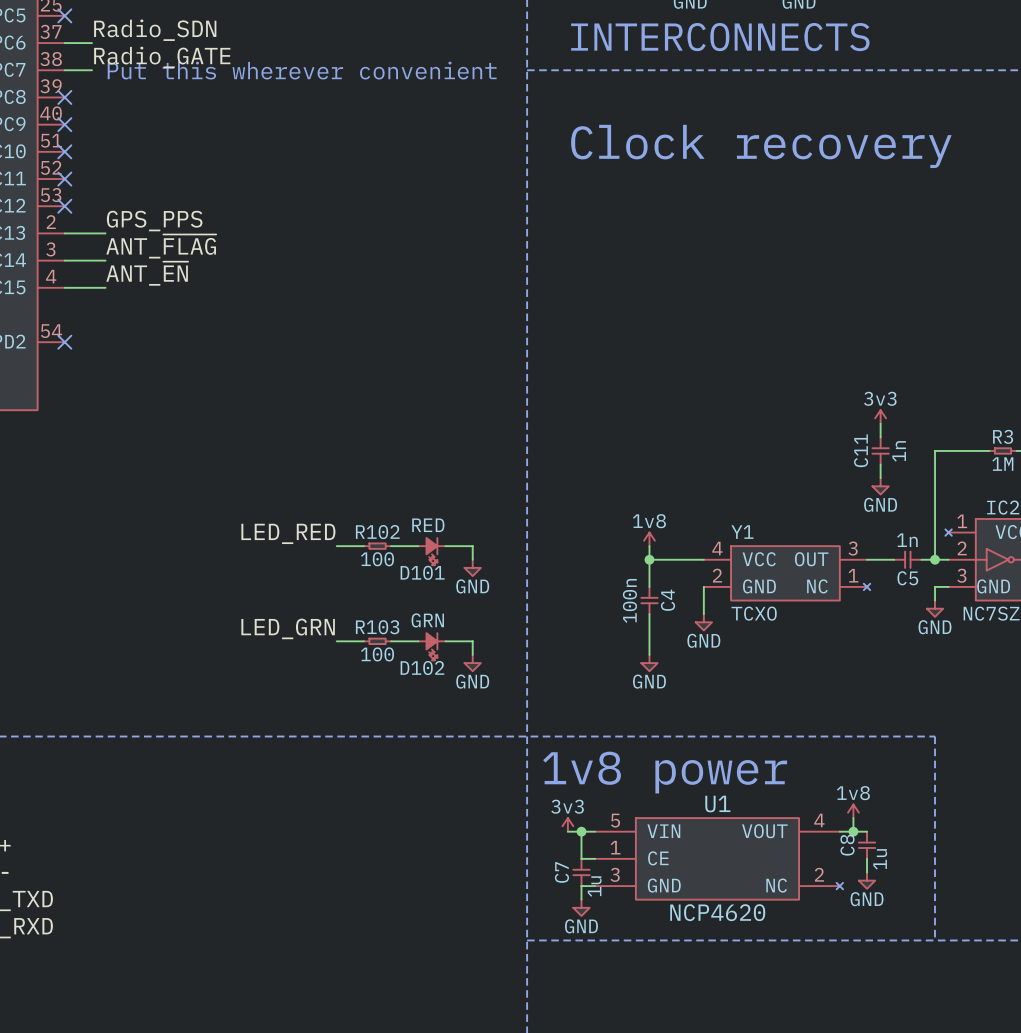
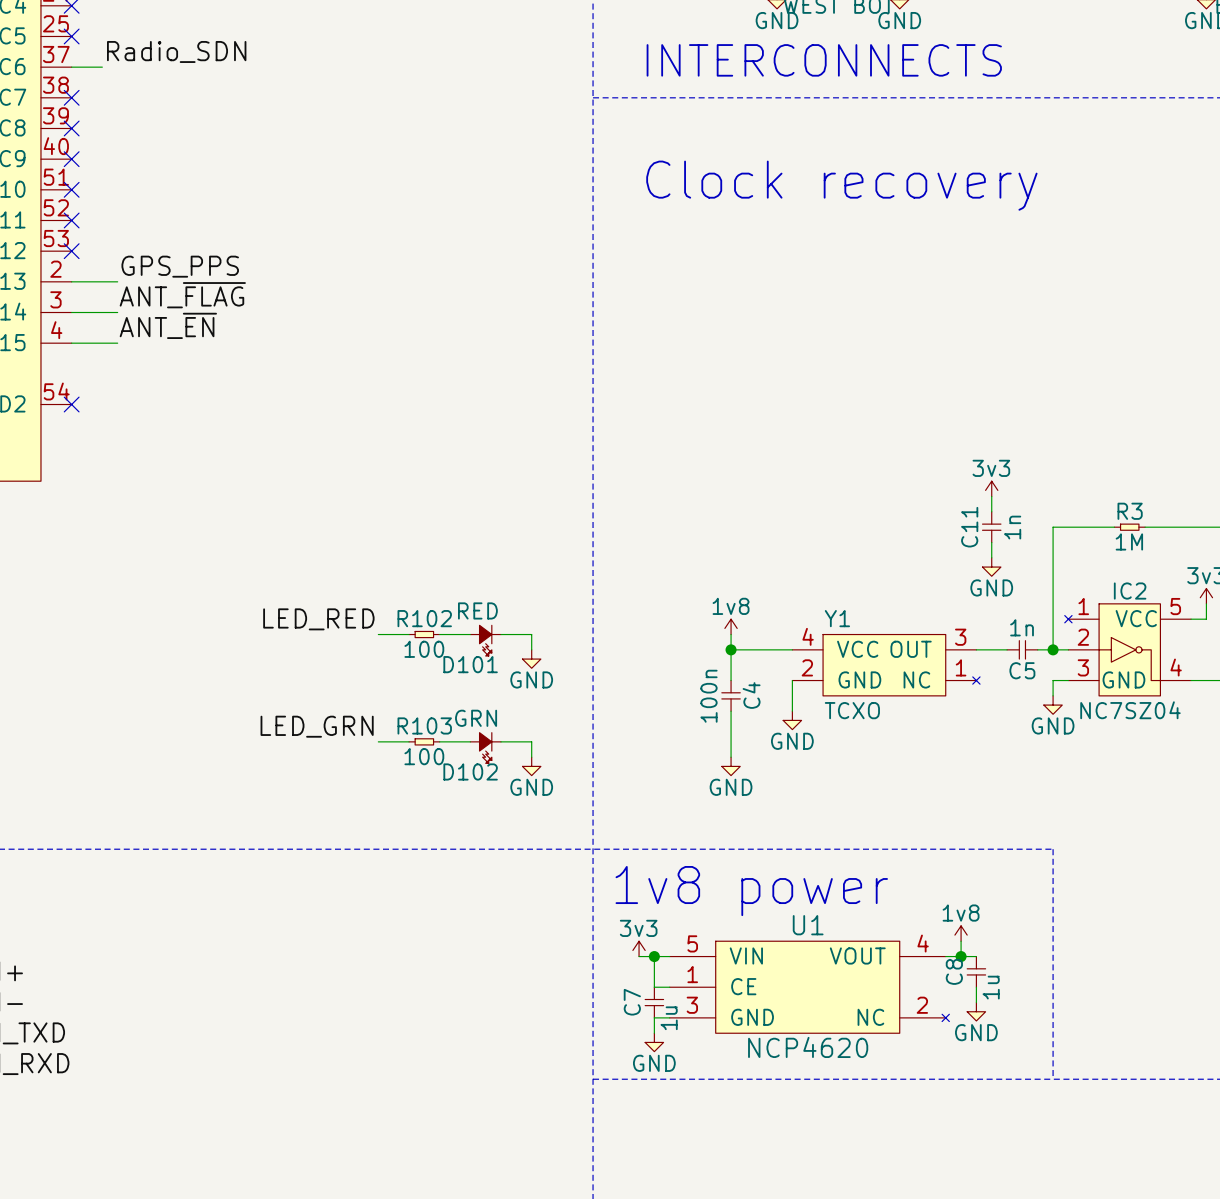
label: Radio_GATE (162, 57) -> none
wire: (64, 70) (92, 70) -> none
no-connect mark: none -> (71, 97)
text: Put this wherever convenient (302, 70) -> none

